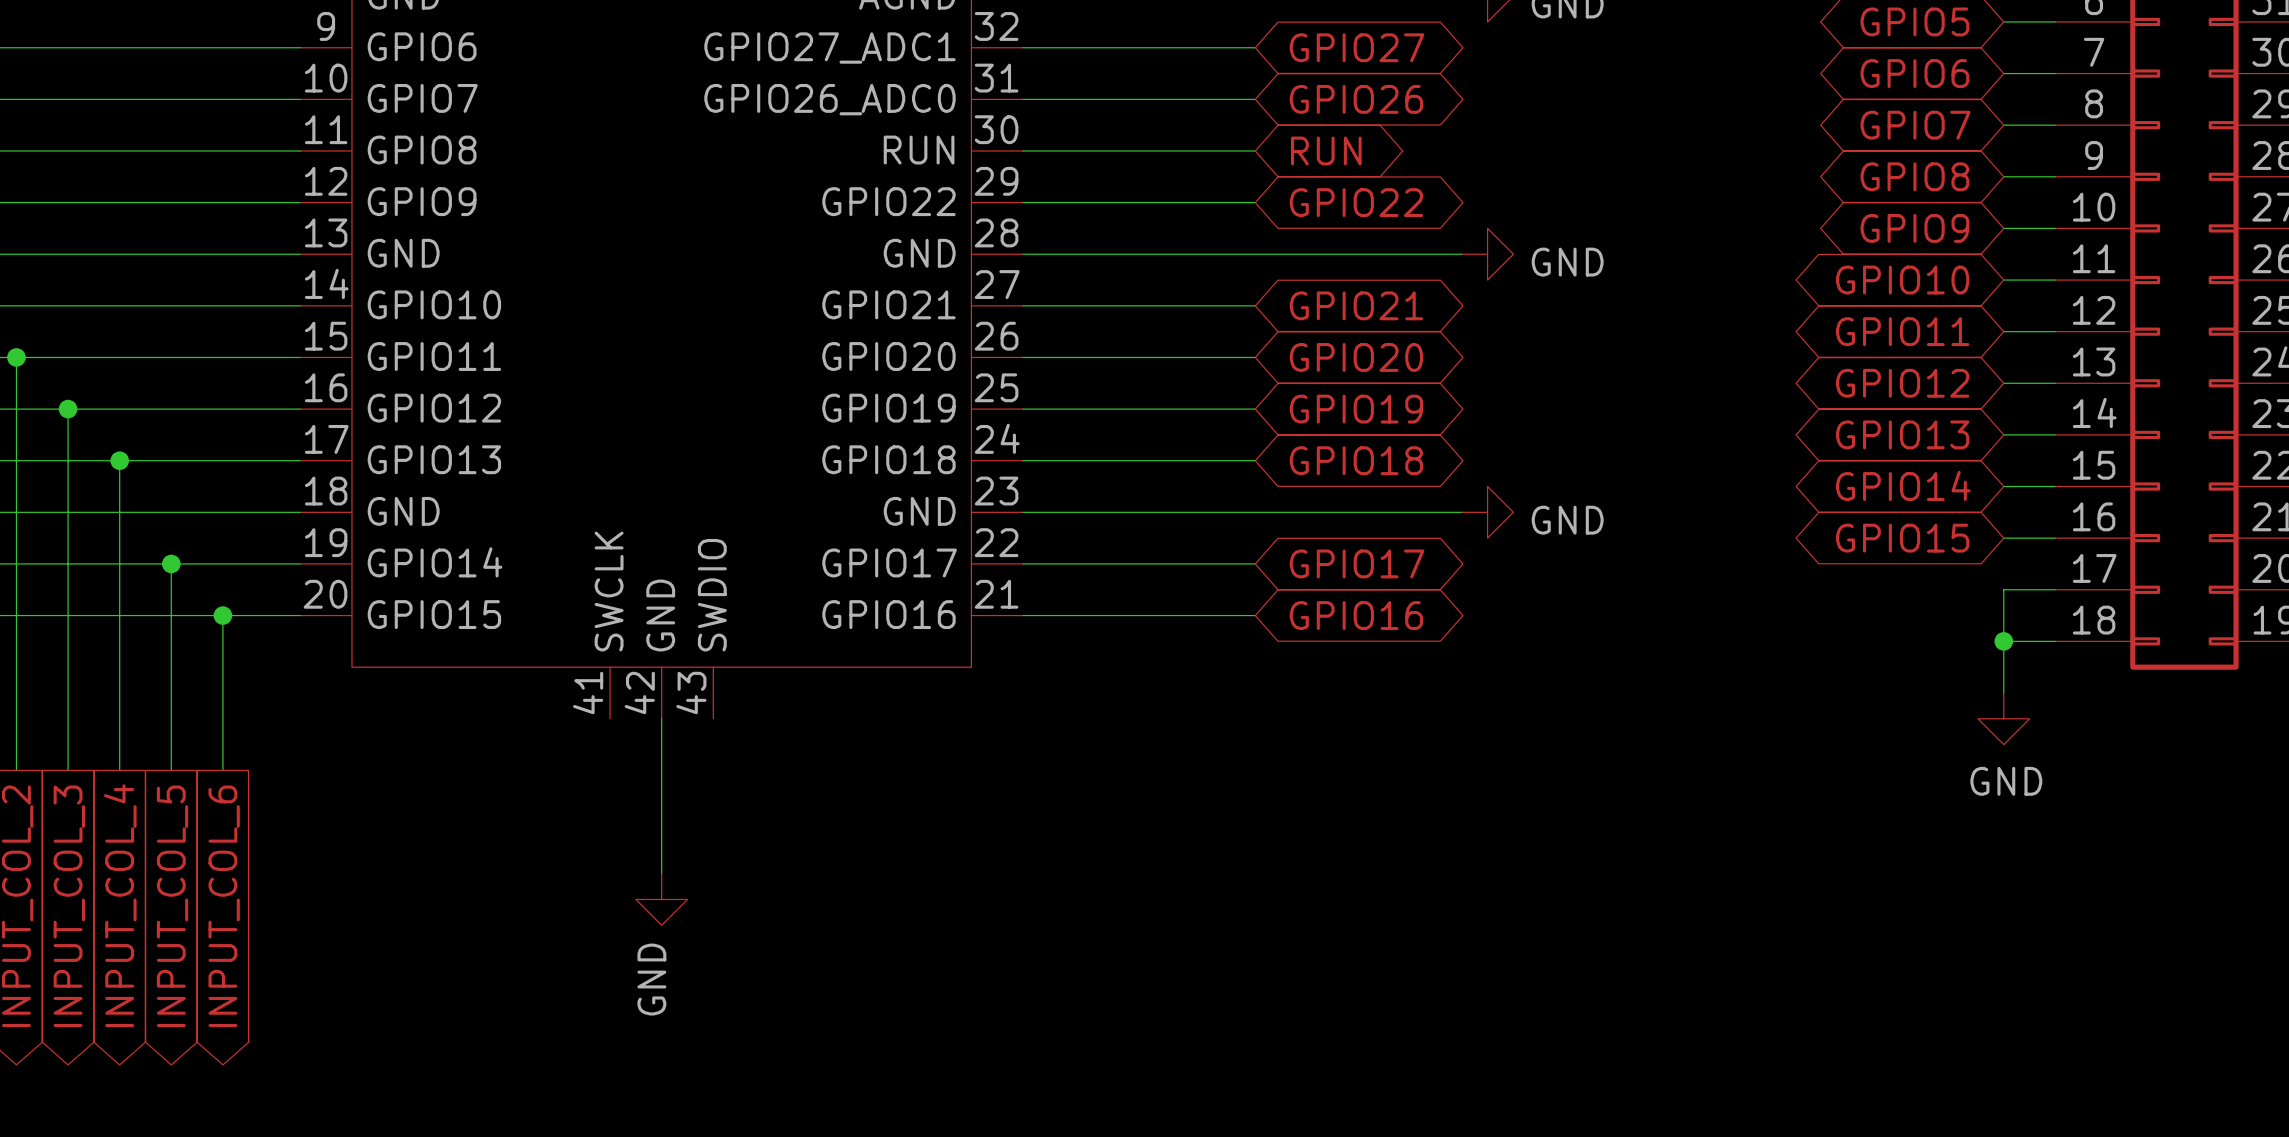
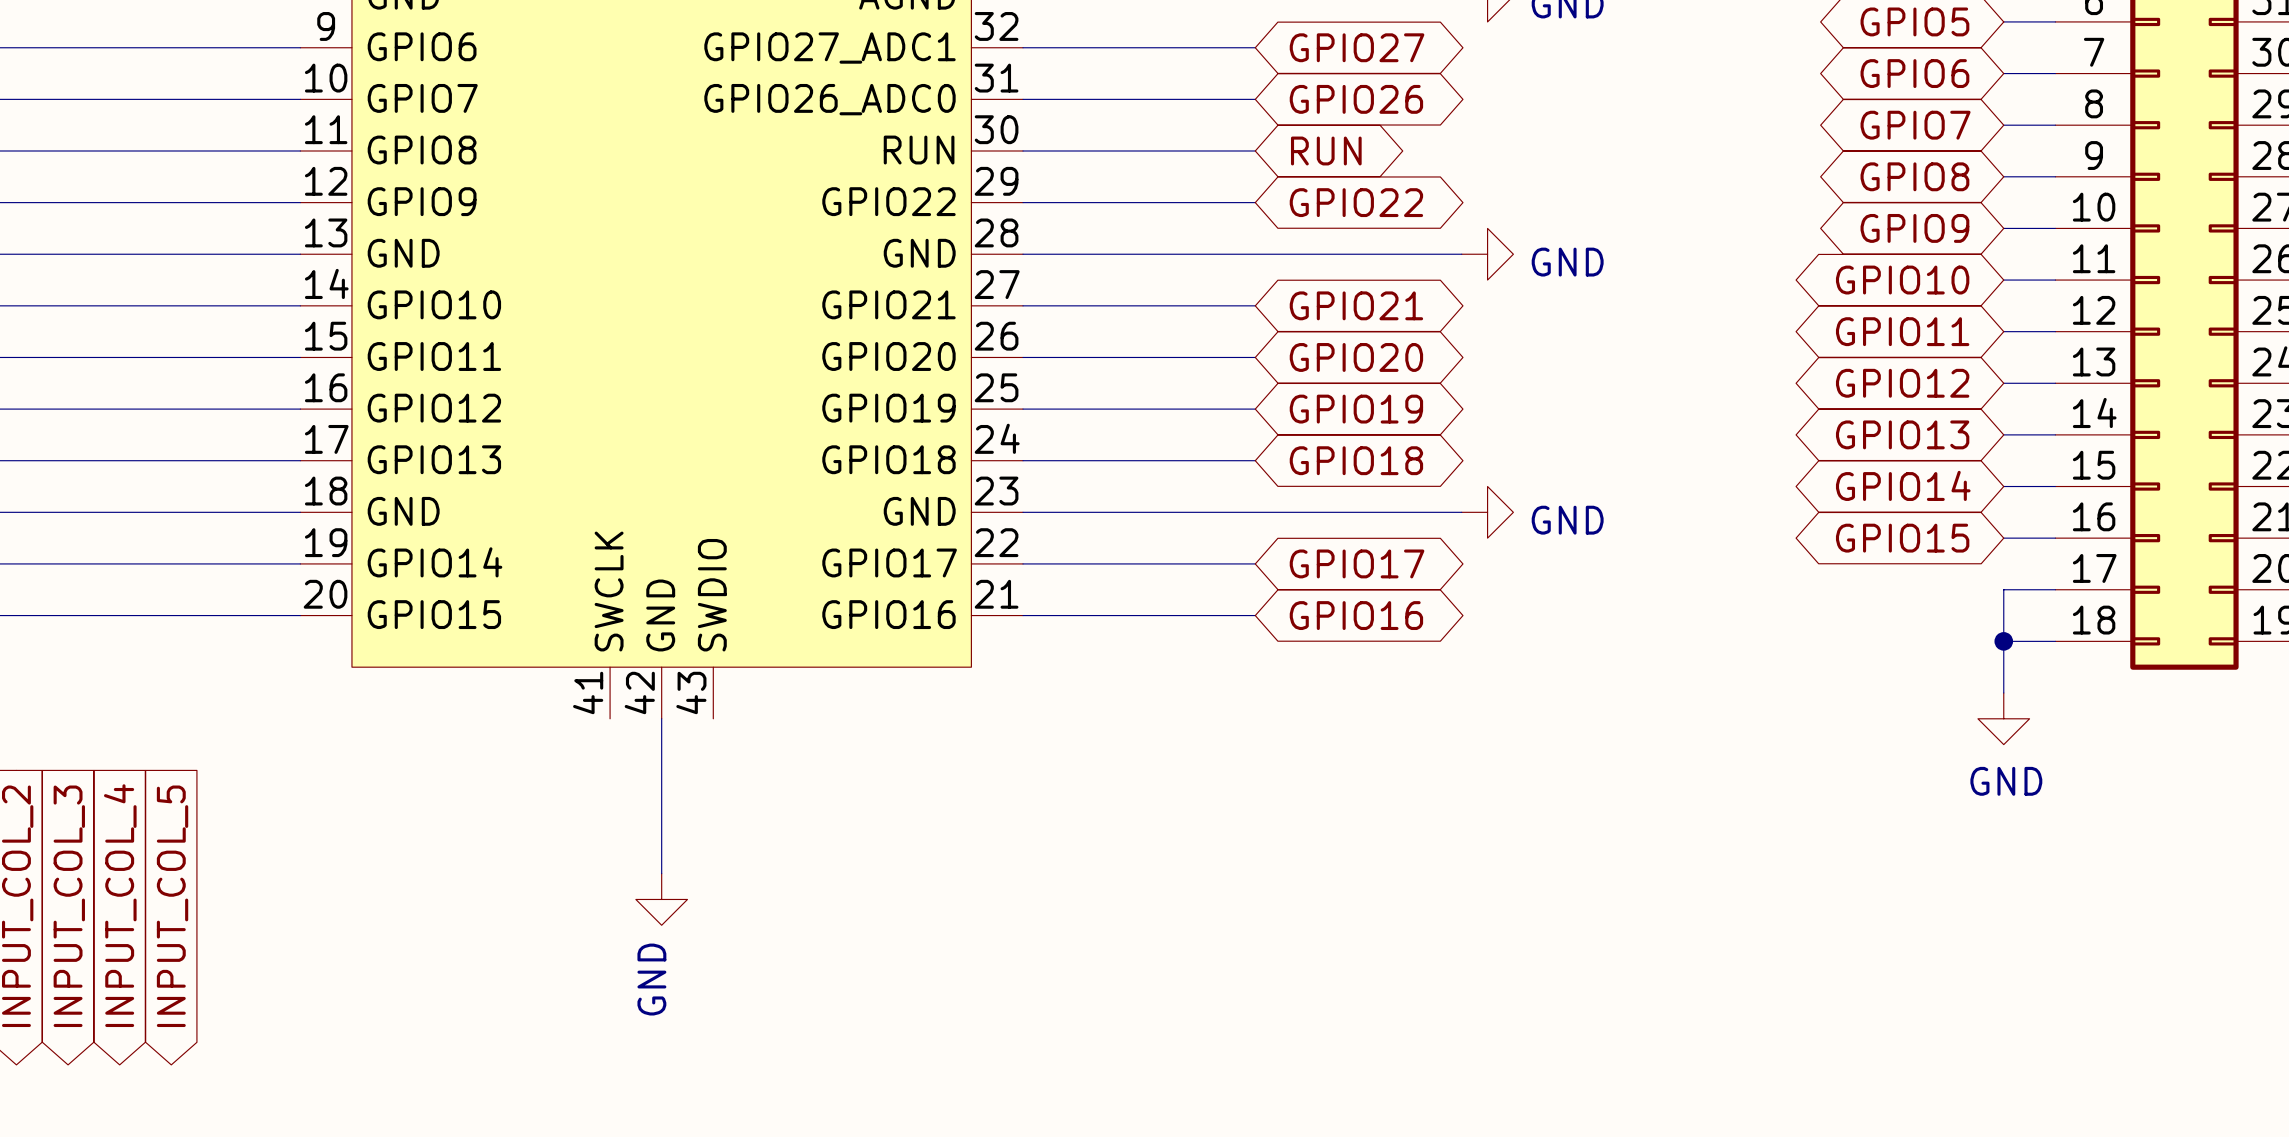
wire: (16, 357) (16, 770) -> none
junction: (16, 357) -> none
wire: (68, 409) (68, 770) -> none
junction: (68, 409) -> none
wire: (119, 460) (119, 770) -> none
junction: (119, 460) -> none
wire: (171, 563) (171, 770) -> none
junction: (171, 563) -> none
wire: (222, 615) (222, 770) -> none
junction: (222, 615) -> none
global label: INPUT_COL_6 (224, 906) -> none

